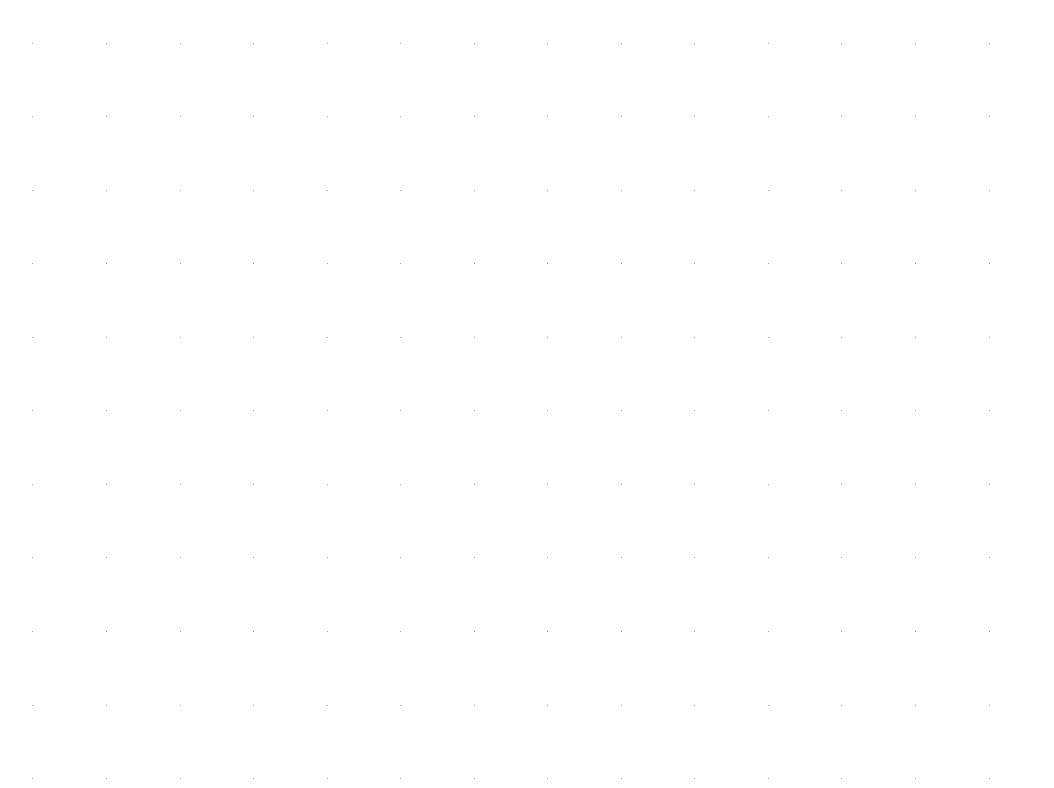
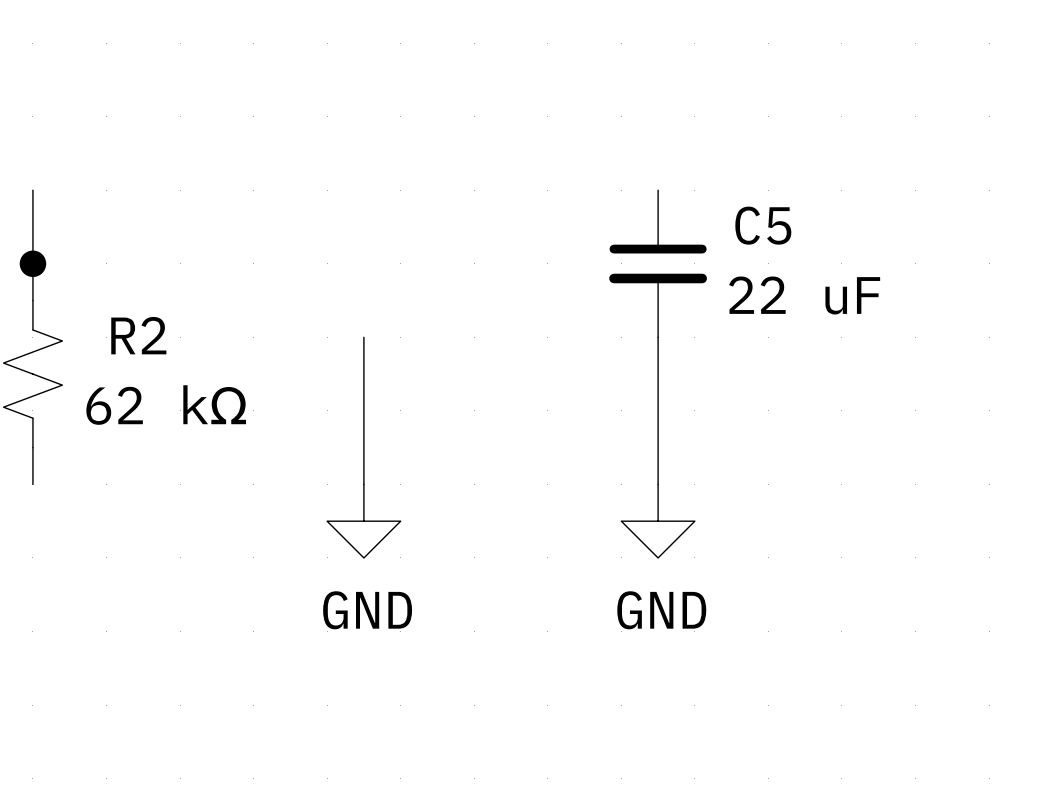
wire: none -> (32, 190) (32, 300)
junction: none -> (32, 263)
C5: none -> 22 uF (658, 263)
wire: none -> (363, 337) (363, 484)
wire: none -> (658, 337) (658, 484)
R2: none -> 62 kΩ (32, 374)
wire: none -> (32, 447) (32, 484)
power symbol: none -> GND (363, 521)
power symbol: none -> GND (658, 521)

